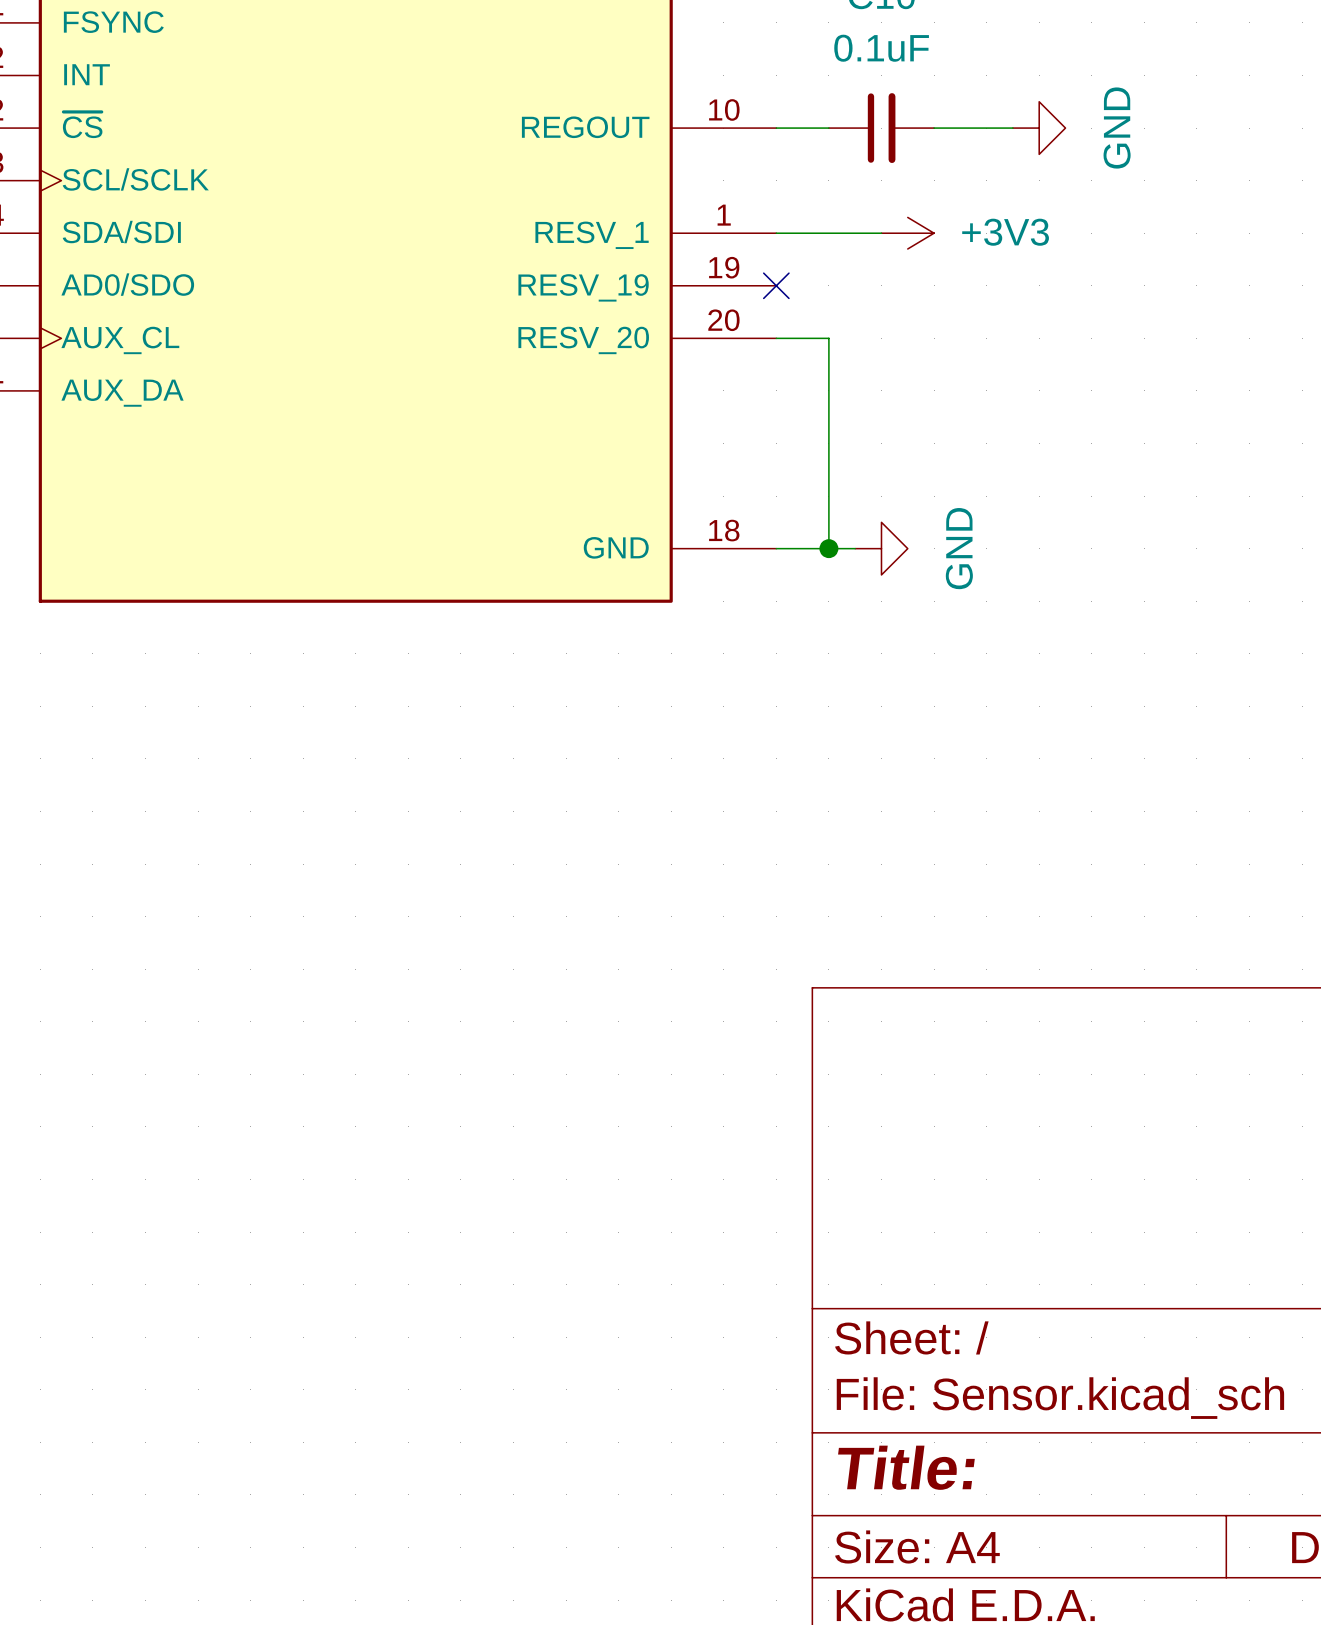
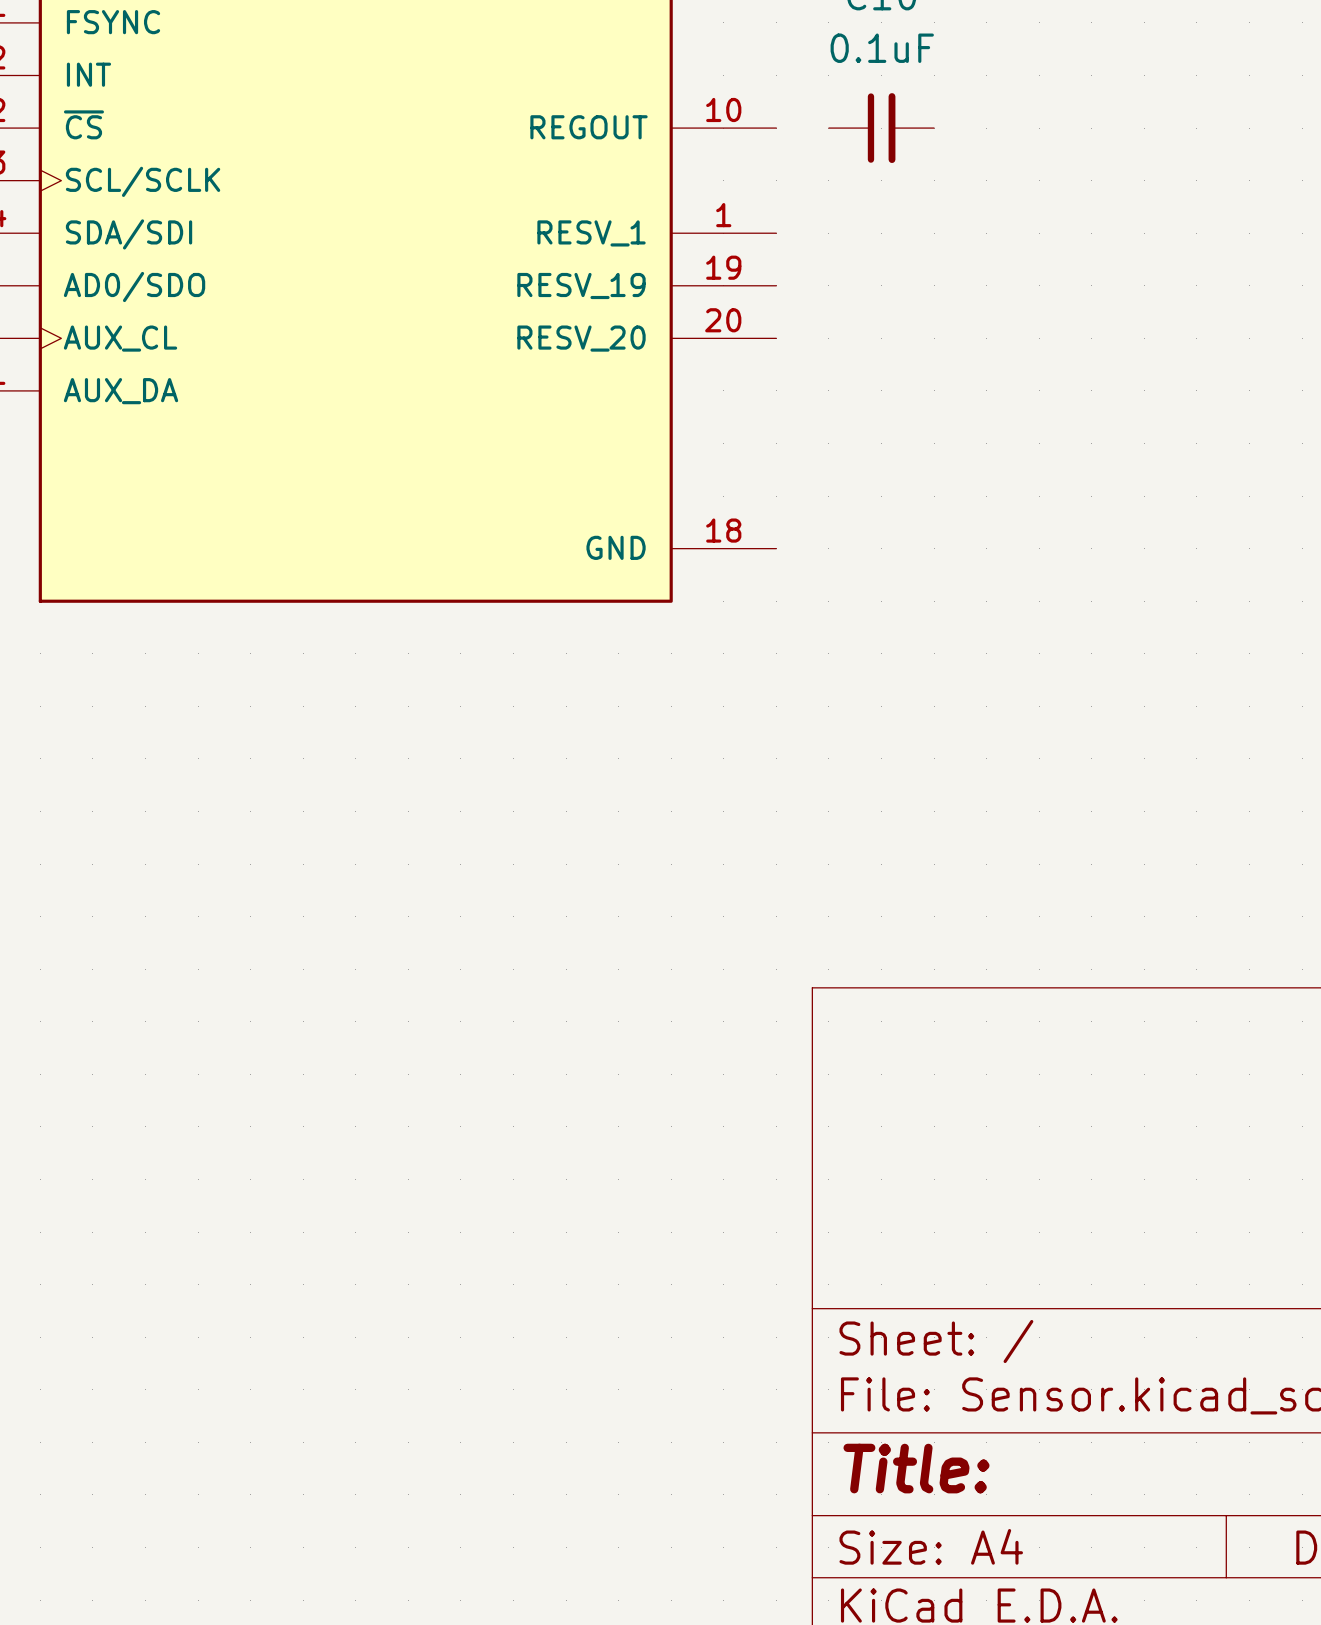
wire: (776, 128) (828, 128) -> none
wire: (934, 128) (1012, 128) -> none
power symbol: GND (1039, 128) -> none
wire: (776, 233) (881, 233) -> none
power symbol: +3V3 (907, 233) -> none
no-connect mark: (776, 285) -> none
wire: (776, 338) (828, 338) (828, 548) -> none
wire: (776, 548) (855, 548) -> none
junction: (828, 548) -> none
power symbol: GND (881, 548) -> none

